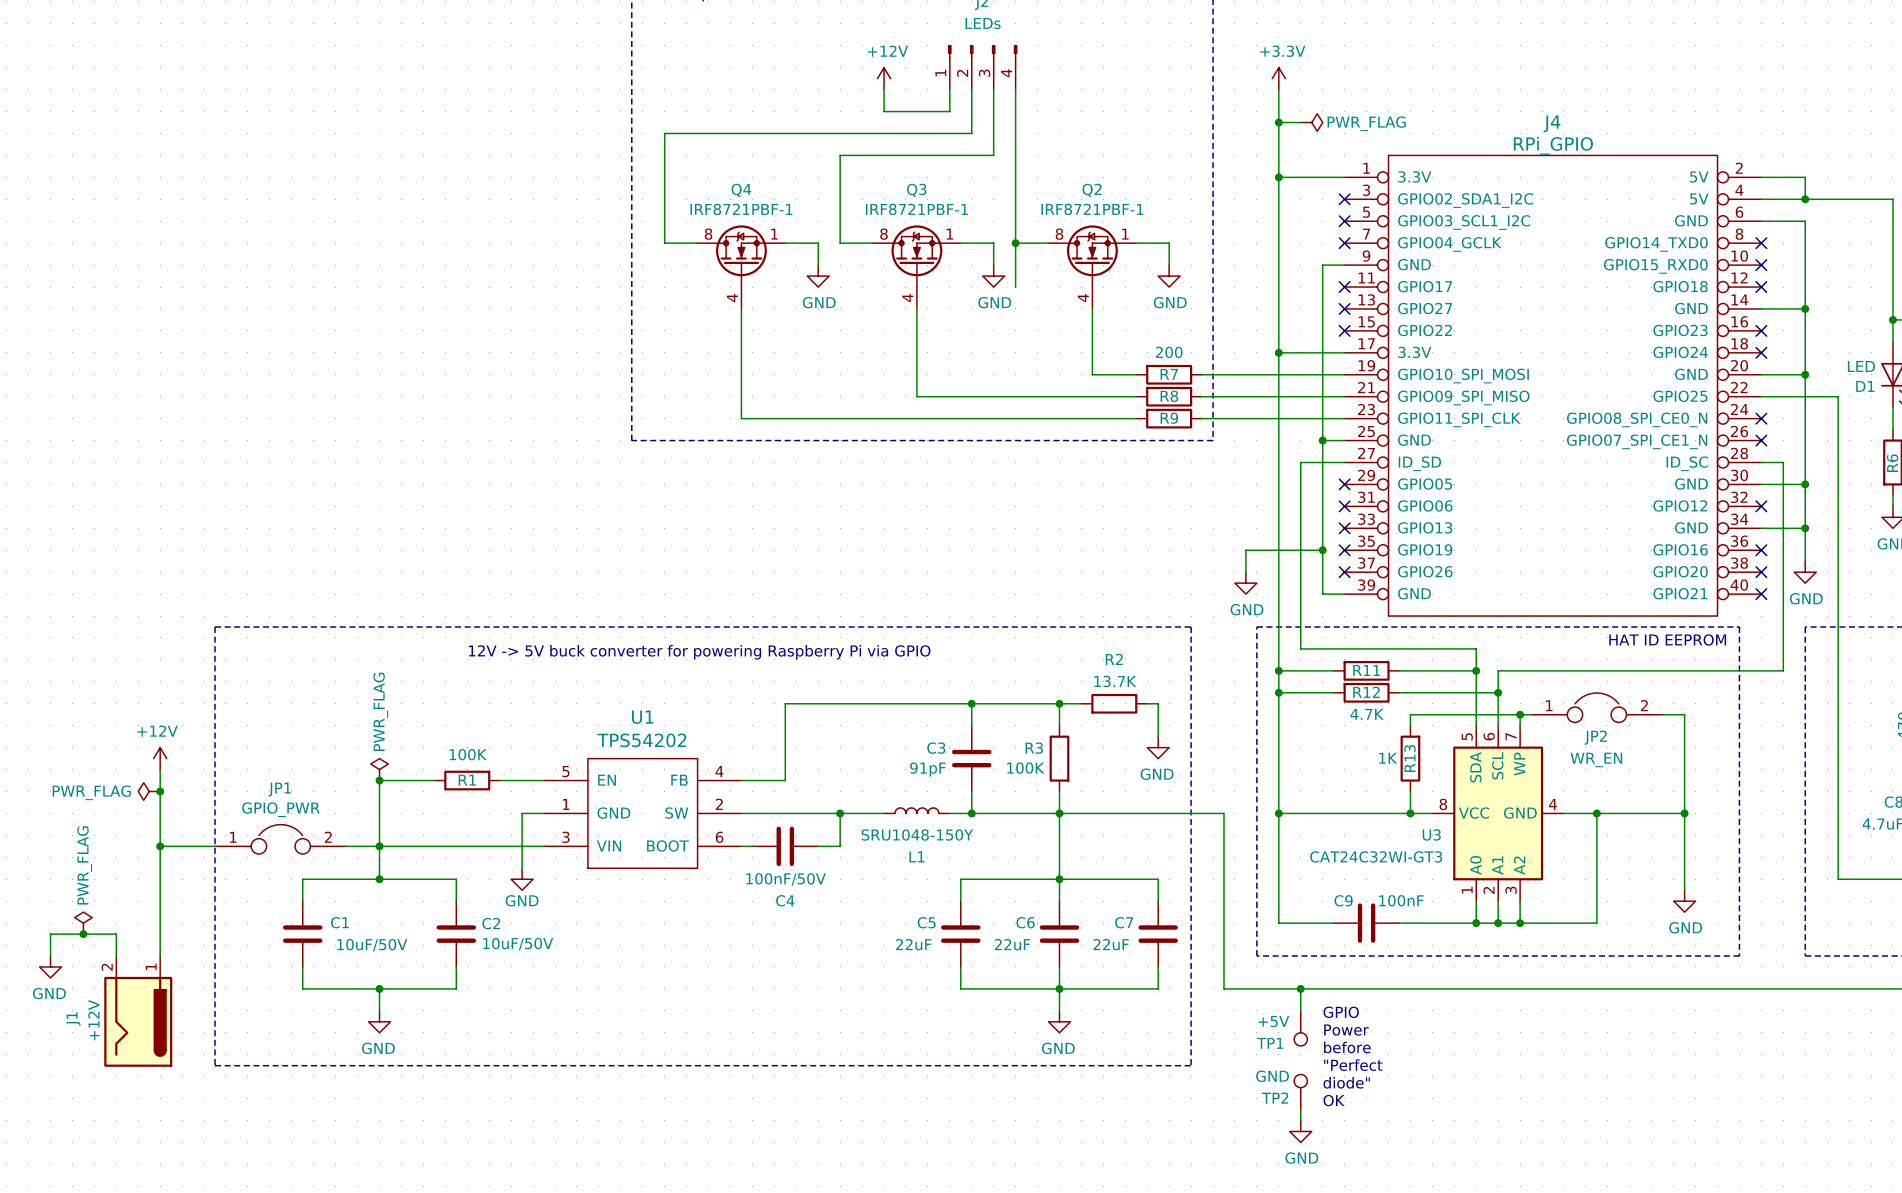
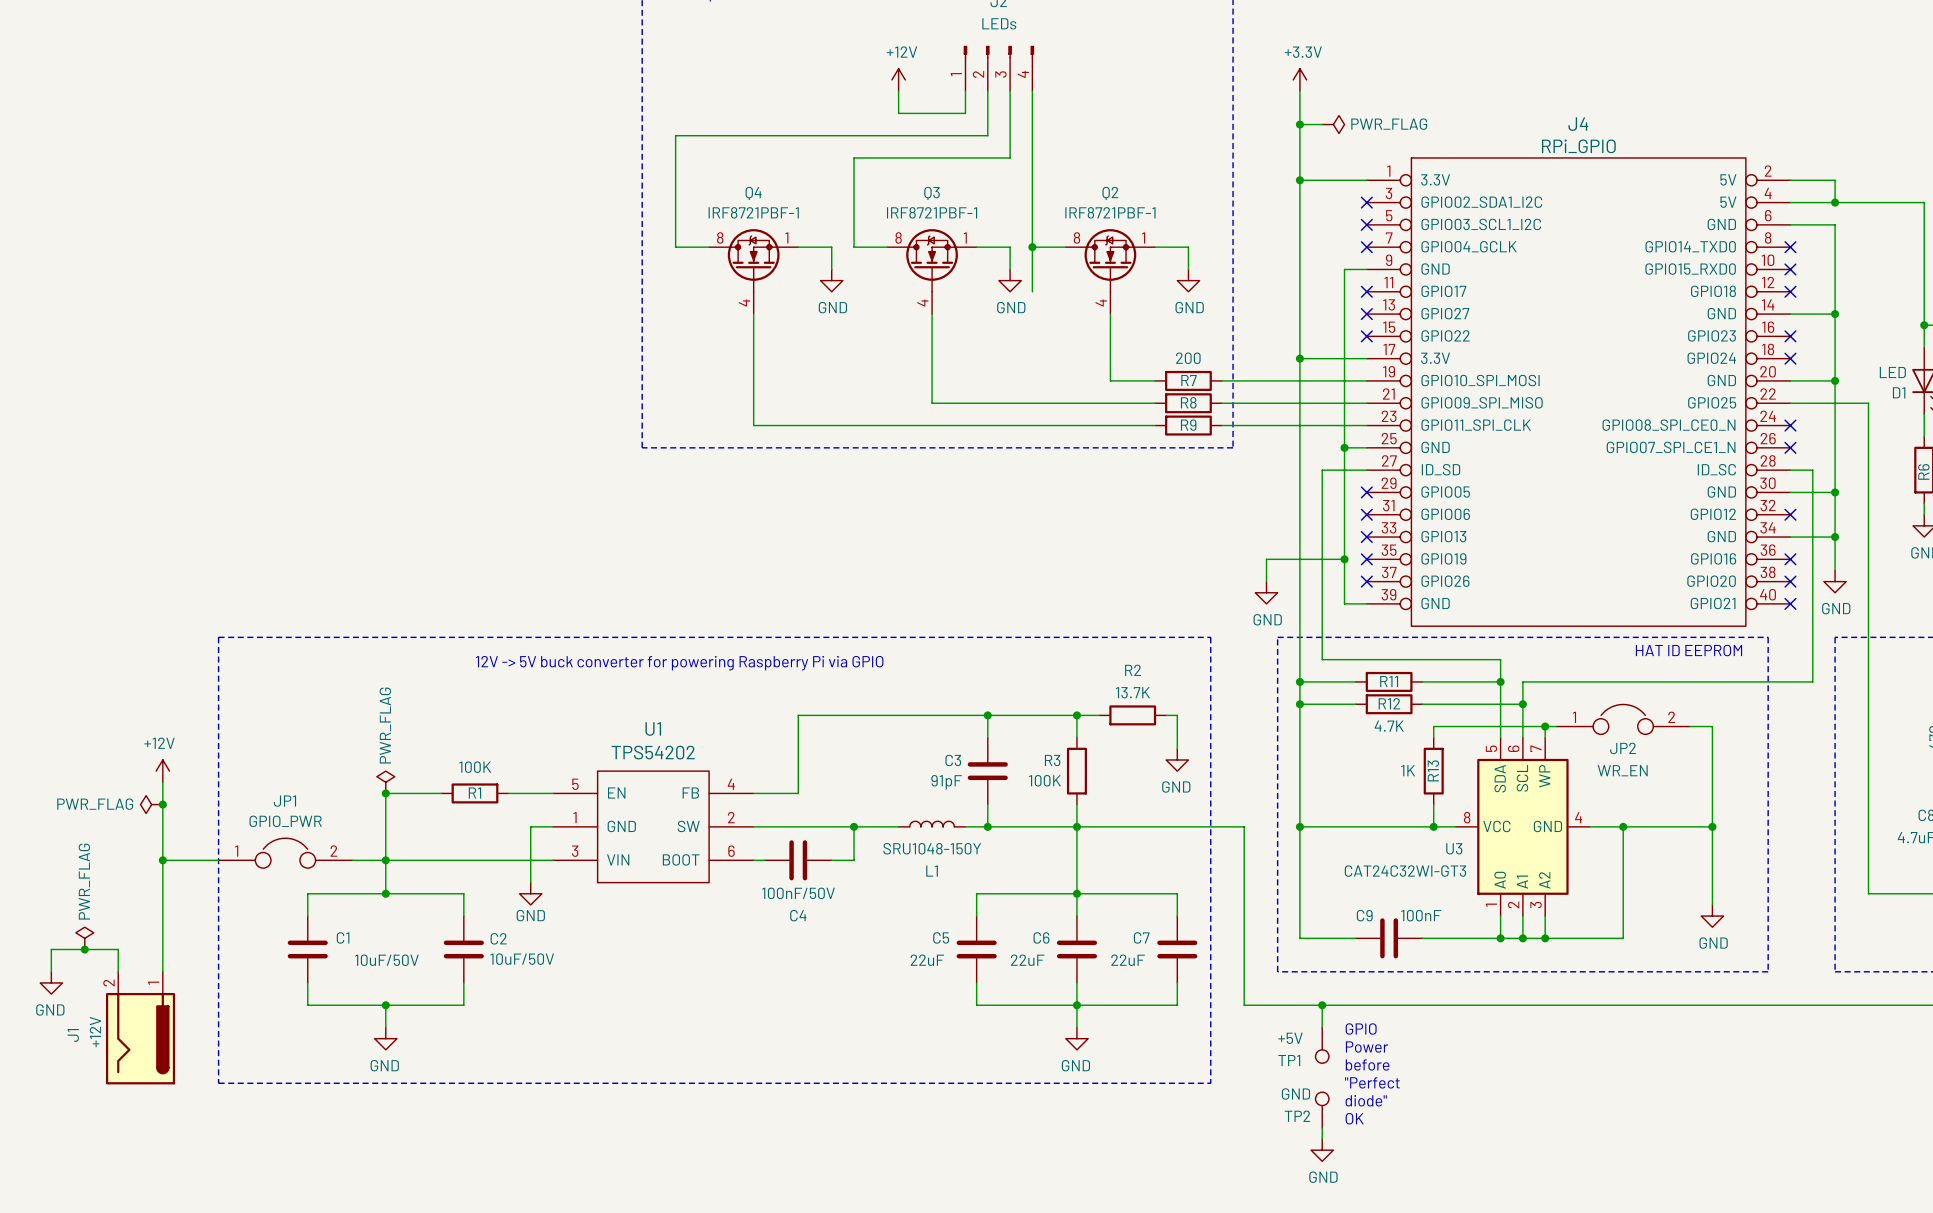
C1 value position: 10uF/50V (372, 945) -> 10uF/50V (386, 960)

